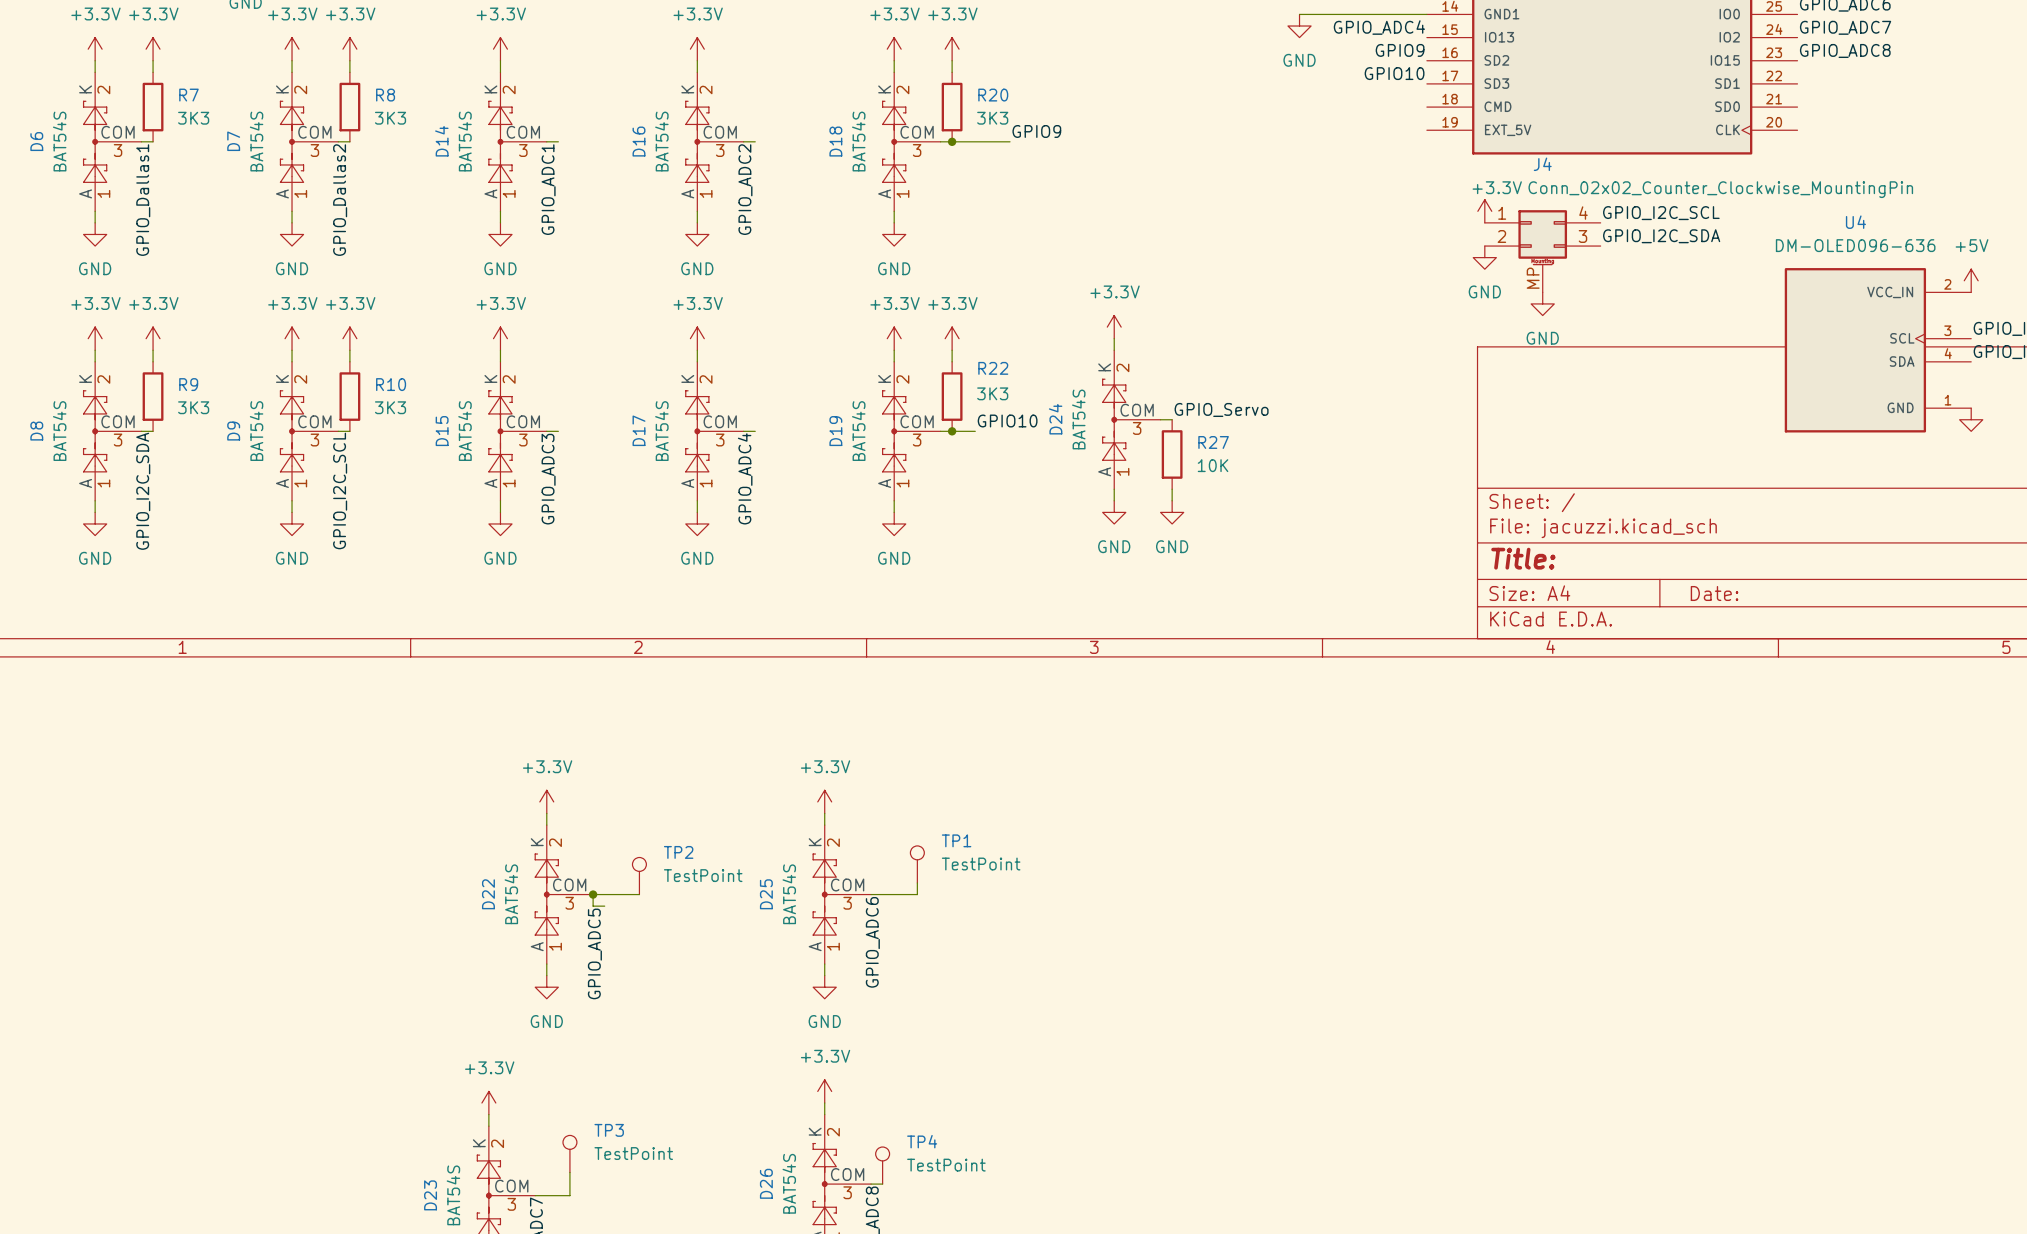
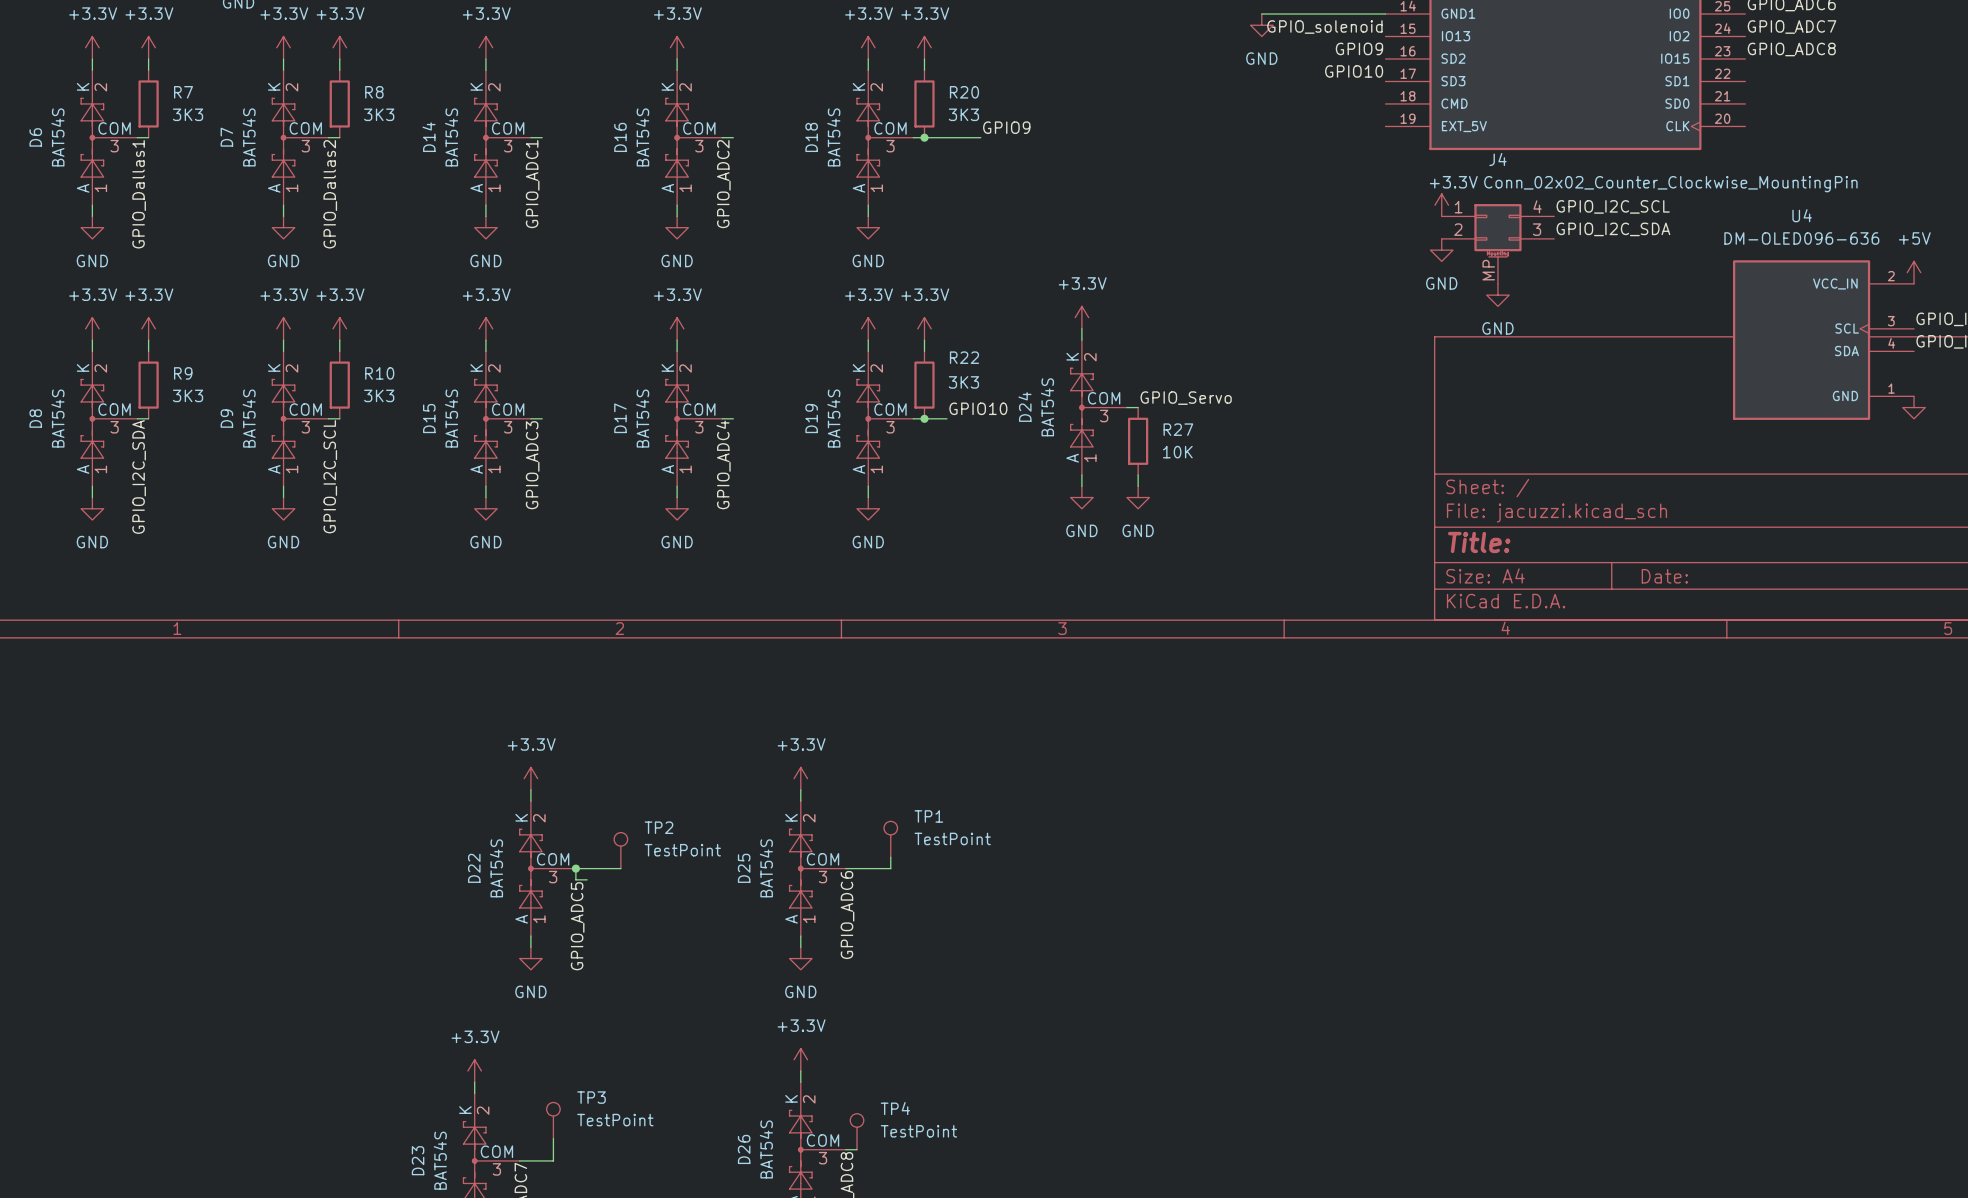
label: GPIO_ADC4 (1379, 27) -> GPIO_solenoid (1324, 27)

